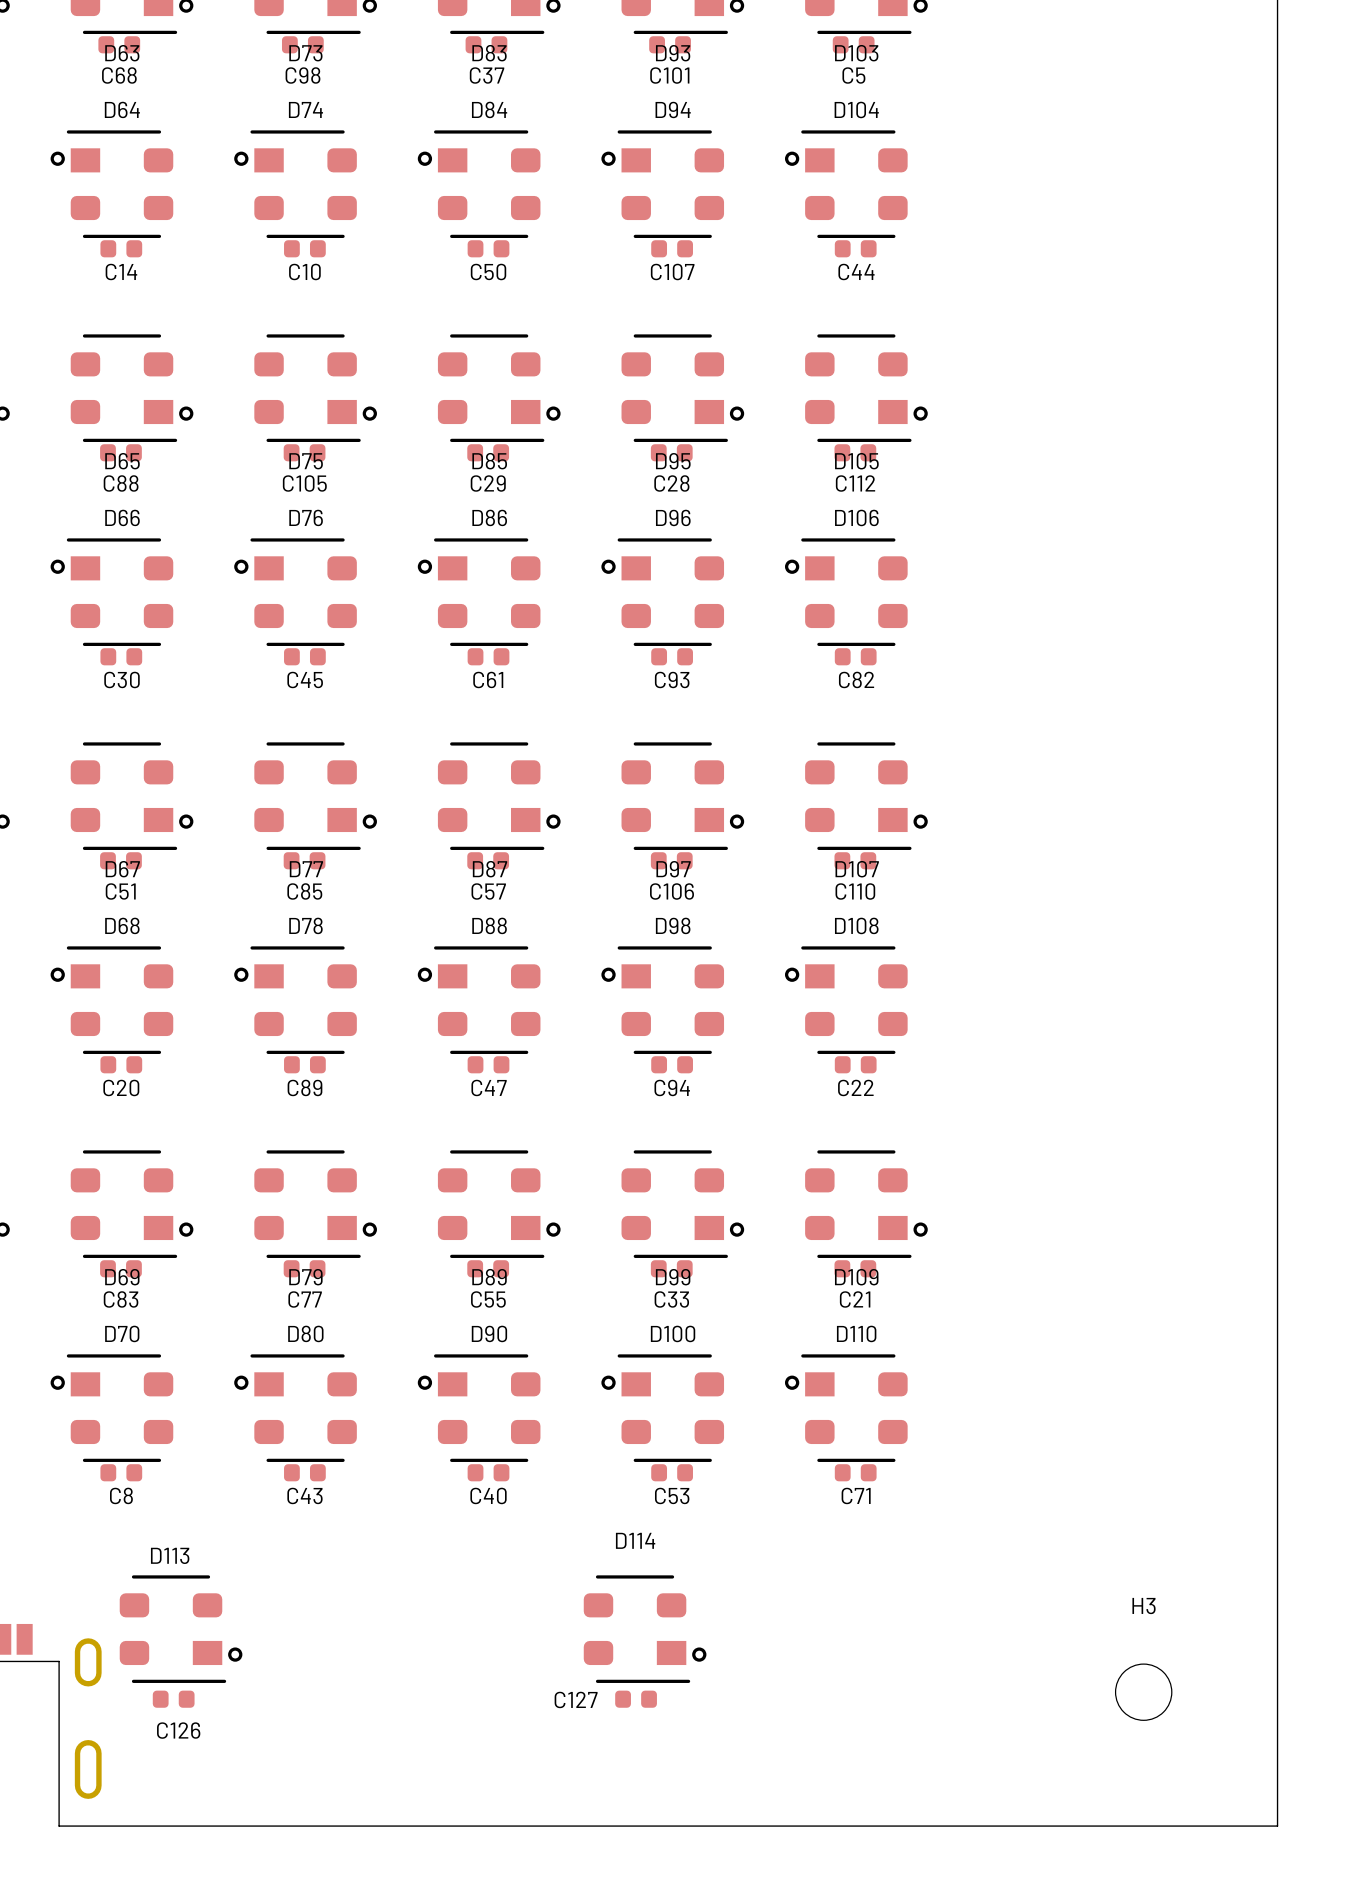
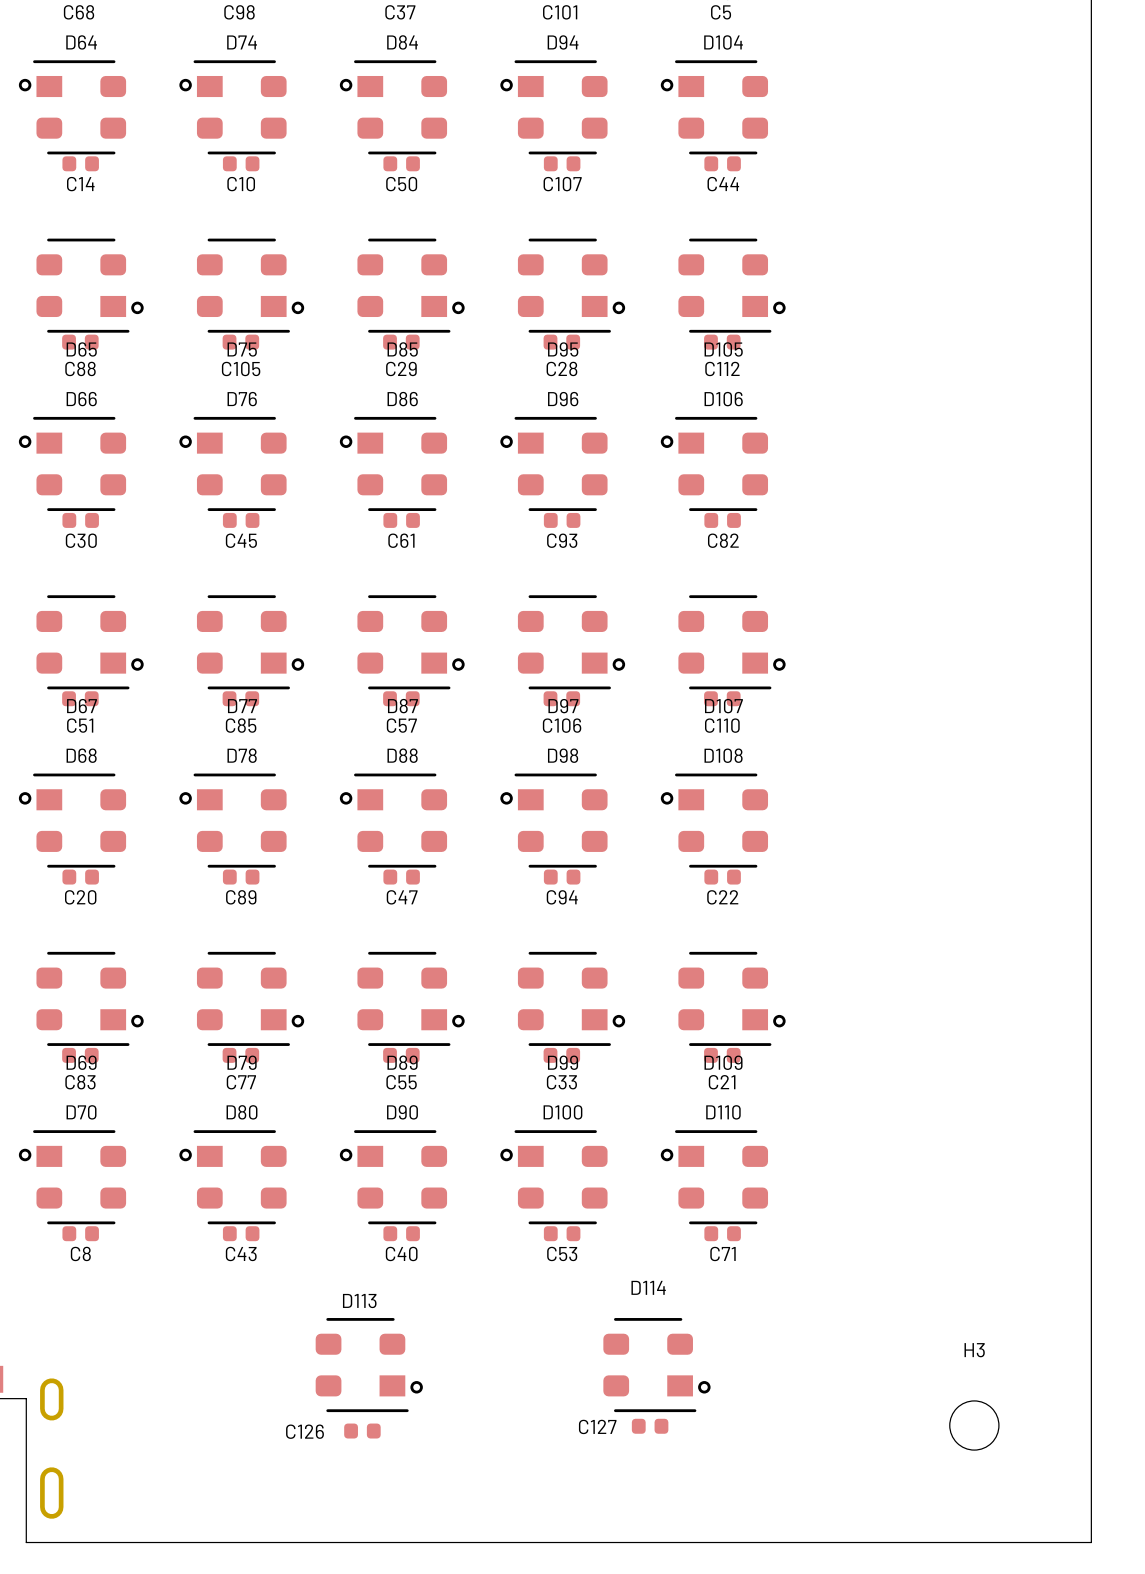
D113 position: (181, 1629) -> (369, 1365)
D114 position: (645, 1629) -> (656, 1365)
C126 position: (173, 1699) -> (362, 1431)
C127 position: (636, 1699) -> (650, 1426)
C126 name position: C126 (178, 1730) -> C126 (304, 1431)

